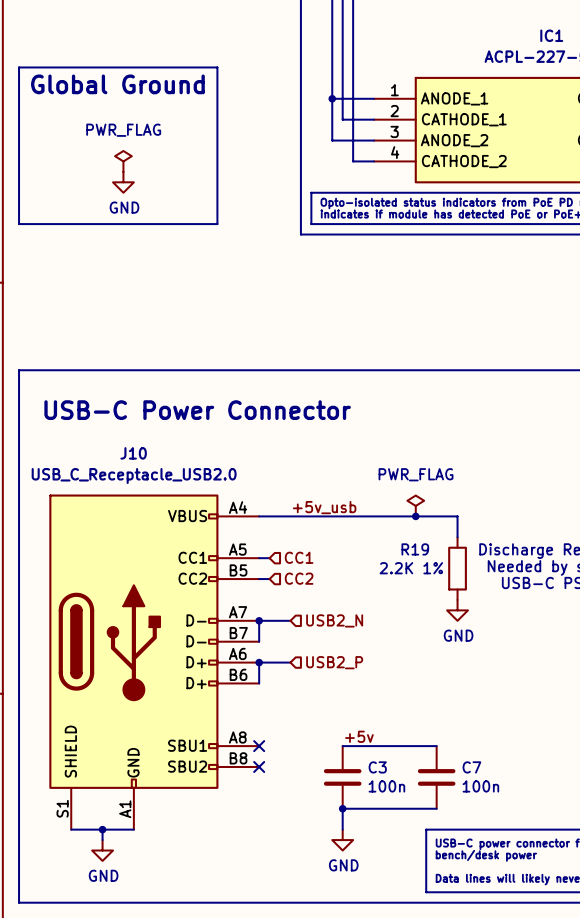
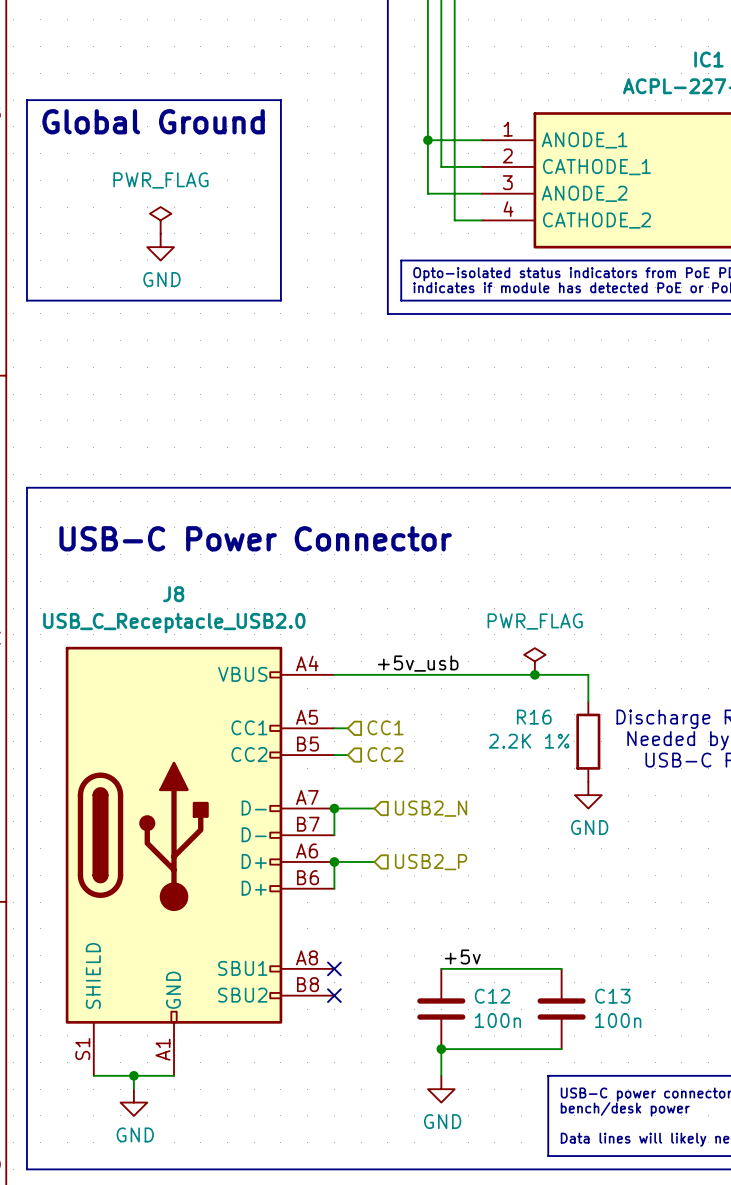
J10 name: J10 (133, 453) -> J8 (173, 594)
R19 name: R19 (415, 549) -> R16 (534, 717)
C3 name: C3 (377, 767) -> C12 (492, 996)
C7 name: C7 (471, 767) -> C13 (612, 996)

